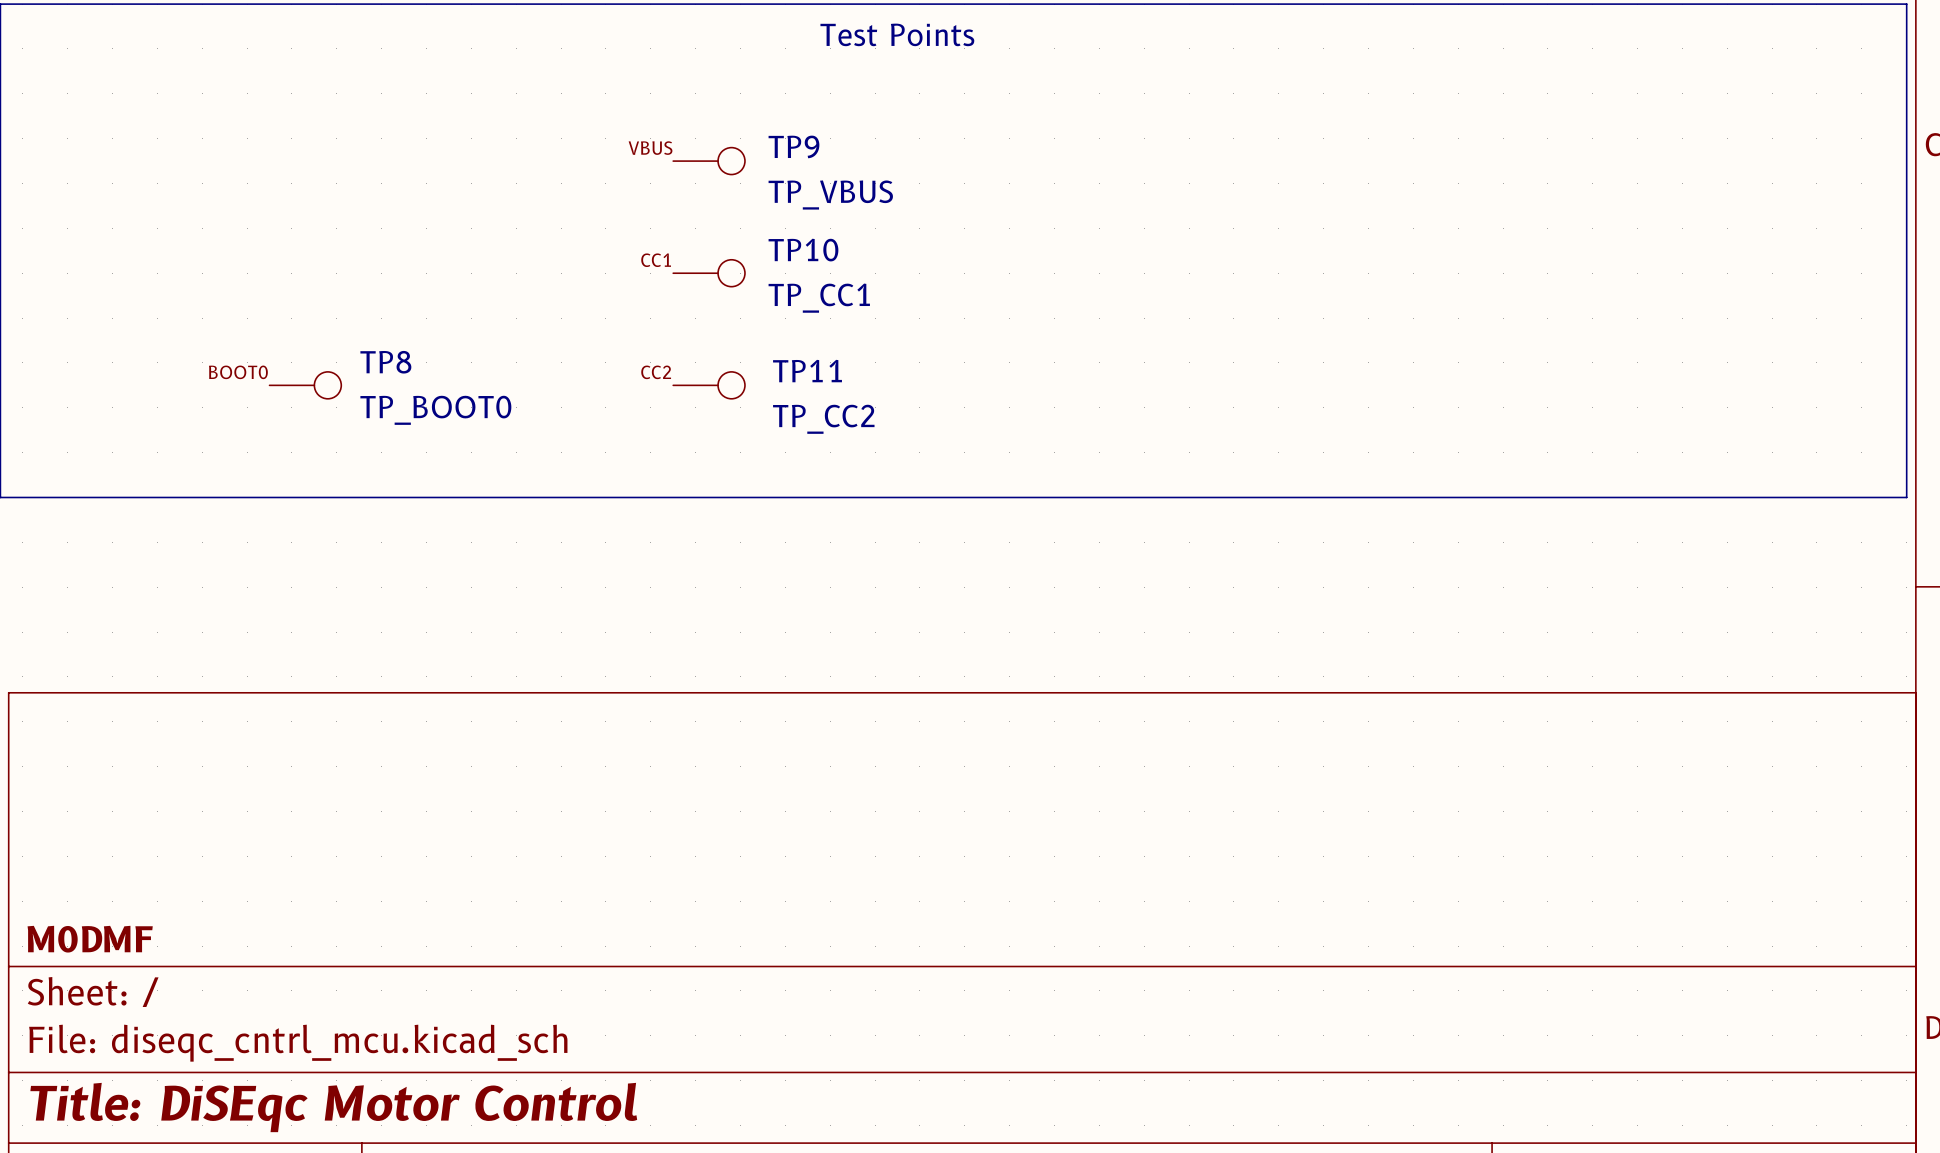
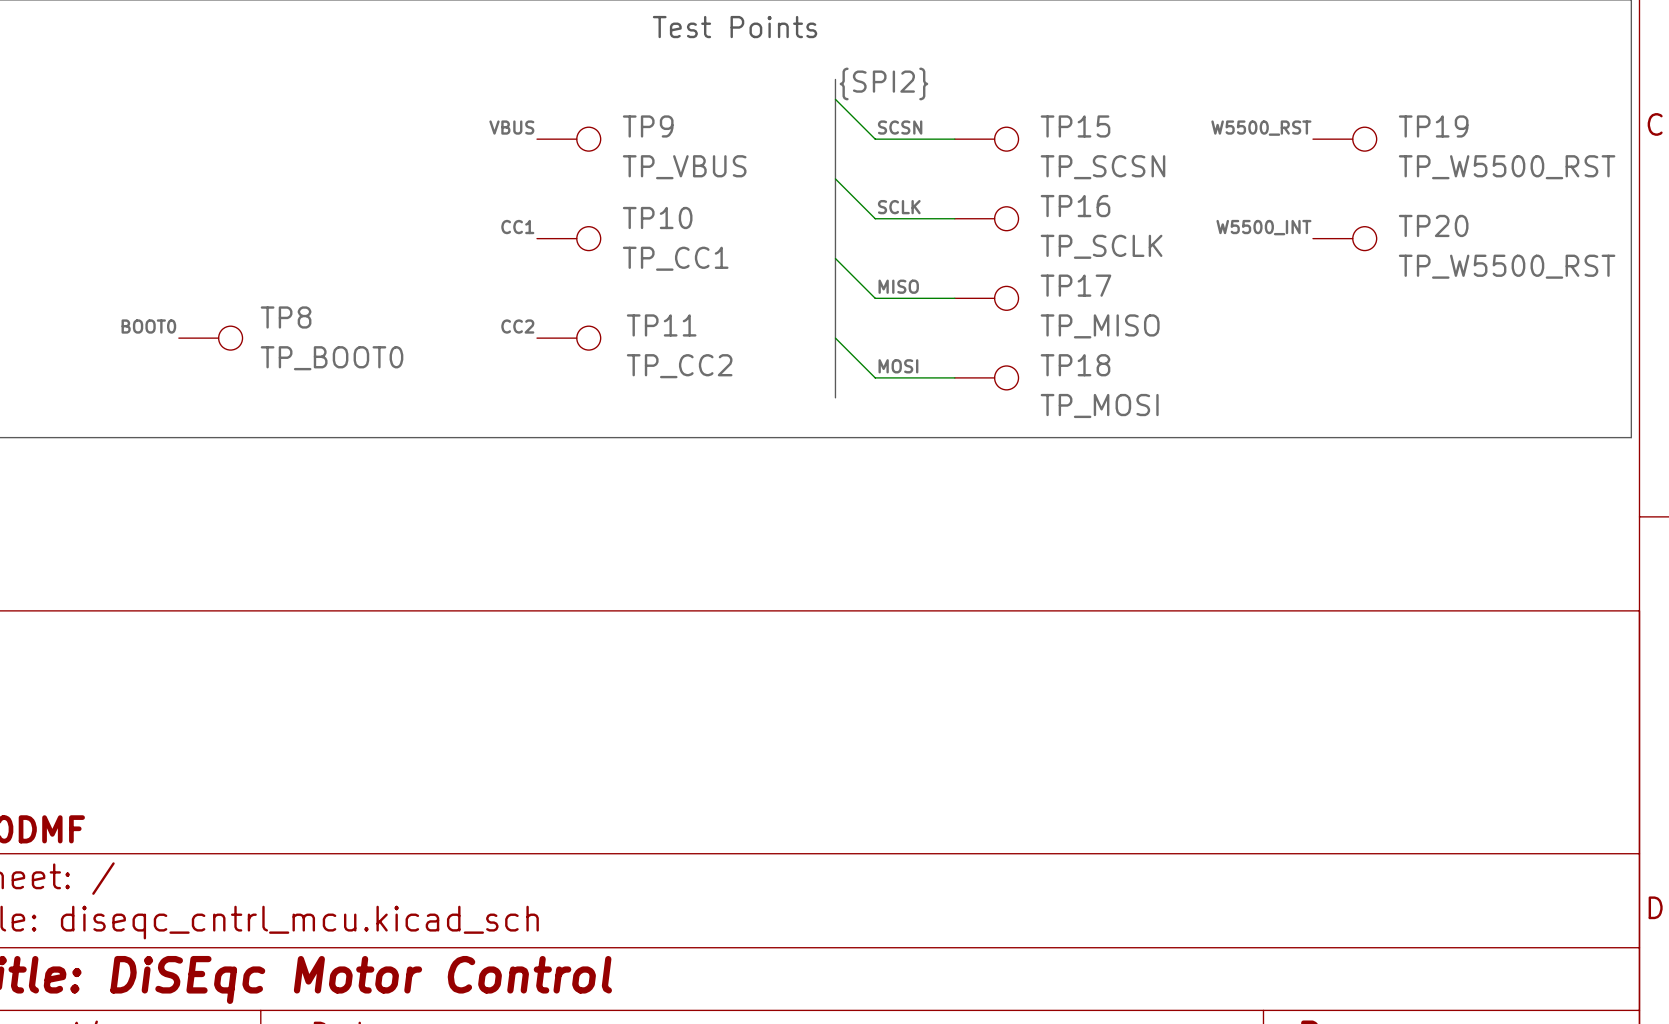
bus: none -> (835, 79) (835, 397)
label: none -> {SPI2} (883, 83)
wire: none -> (835, 99) (875, 139) (954, 139)
label: none -> SCSN (900, 127)
label: none -> W5500_RST (1261, 128)
TP15: none -> TP_SCSN (986, 139)
TP19: none -> TP_W5500_RST (1344, 139)
wire: none -> (835, 178) (875, 218) (954, 218)
label: none -> SCLK (899, 207)
TP16: none -> TP_SCLK (986, 218)
label: none -> W5500_INT (1263, 227)
TP20: none -> TP_W5500_RST (1344, 238)
wire: none -> (835, 258) (875, 298) (954, 298)
label: none -> MISO (898, 286)
TP17: none -> TP_MISO (986, 298)
wire: none -> (835, 338) (875, 377) (954, 377)
label: none -> MOSI (898, 366)
TP18: none -> TP_MOSI (986, 377)

